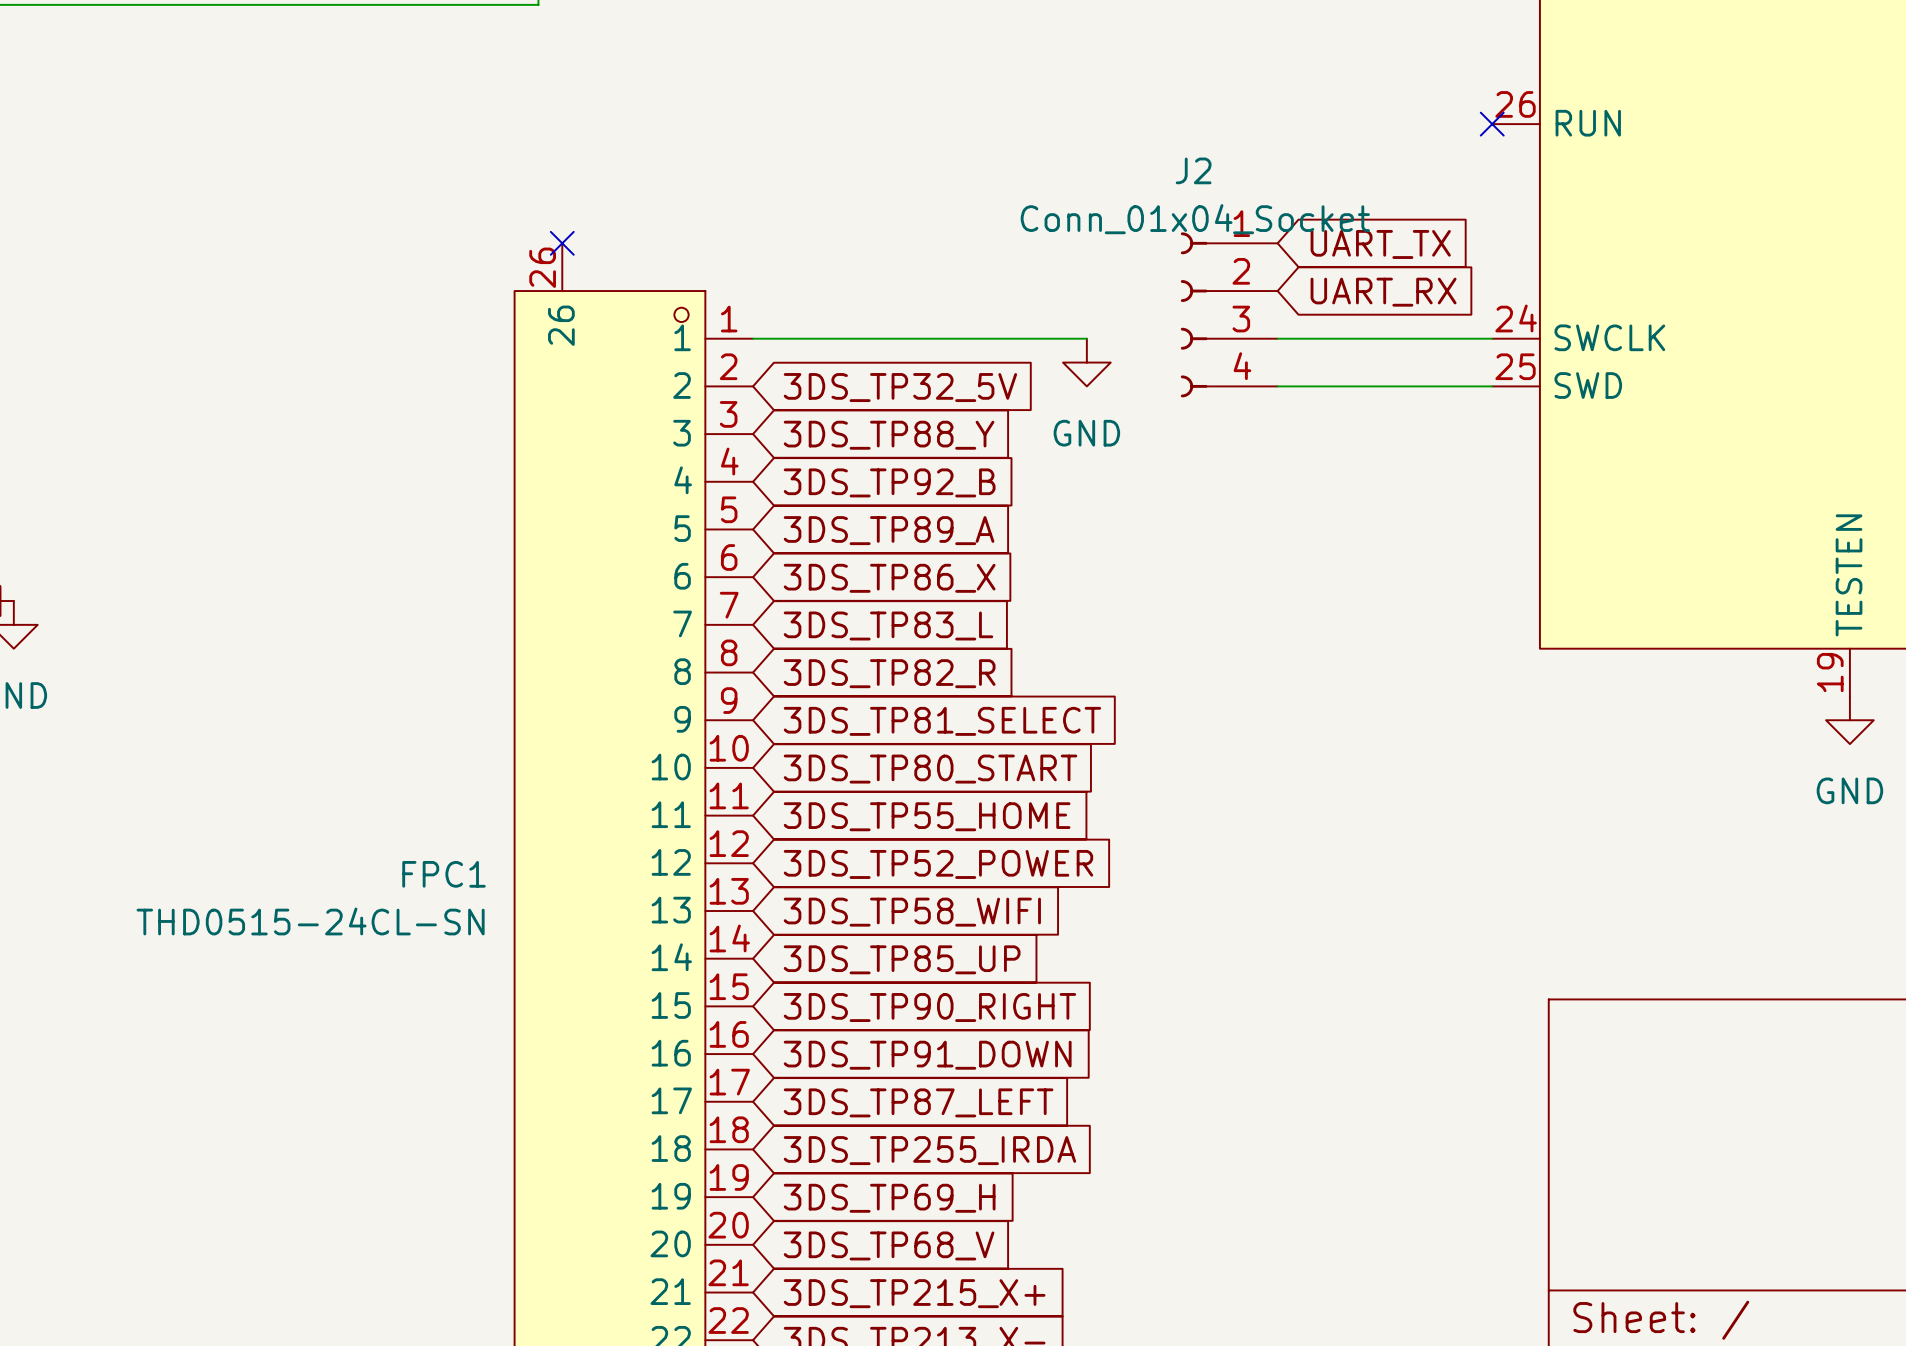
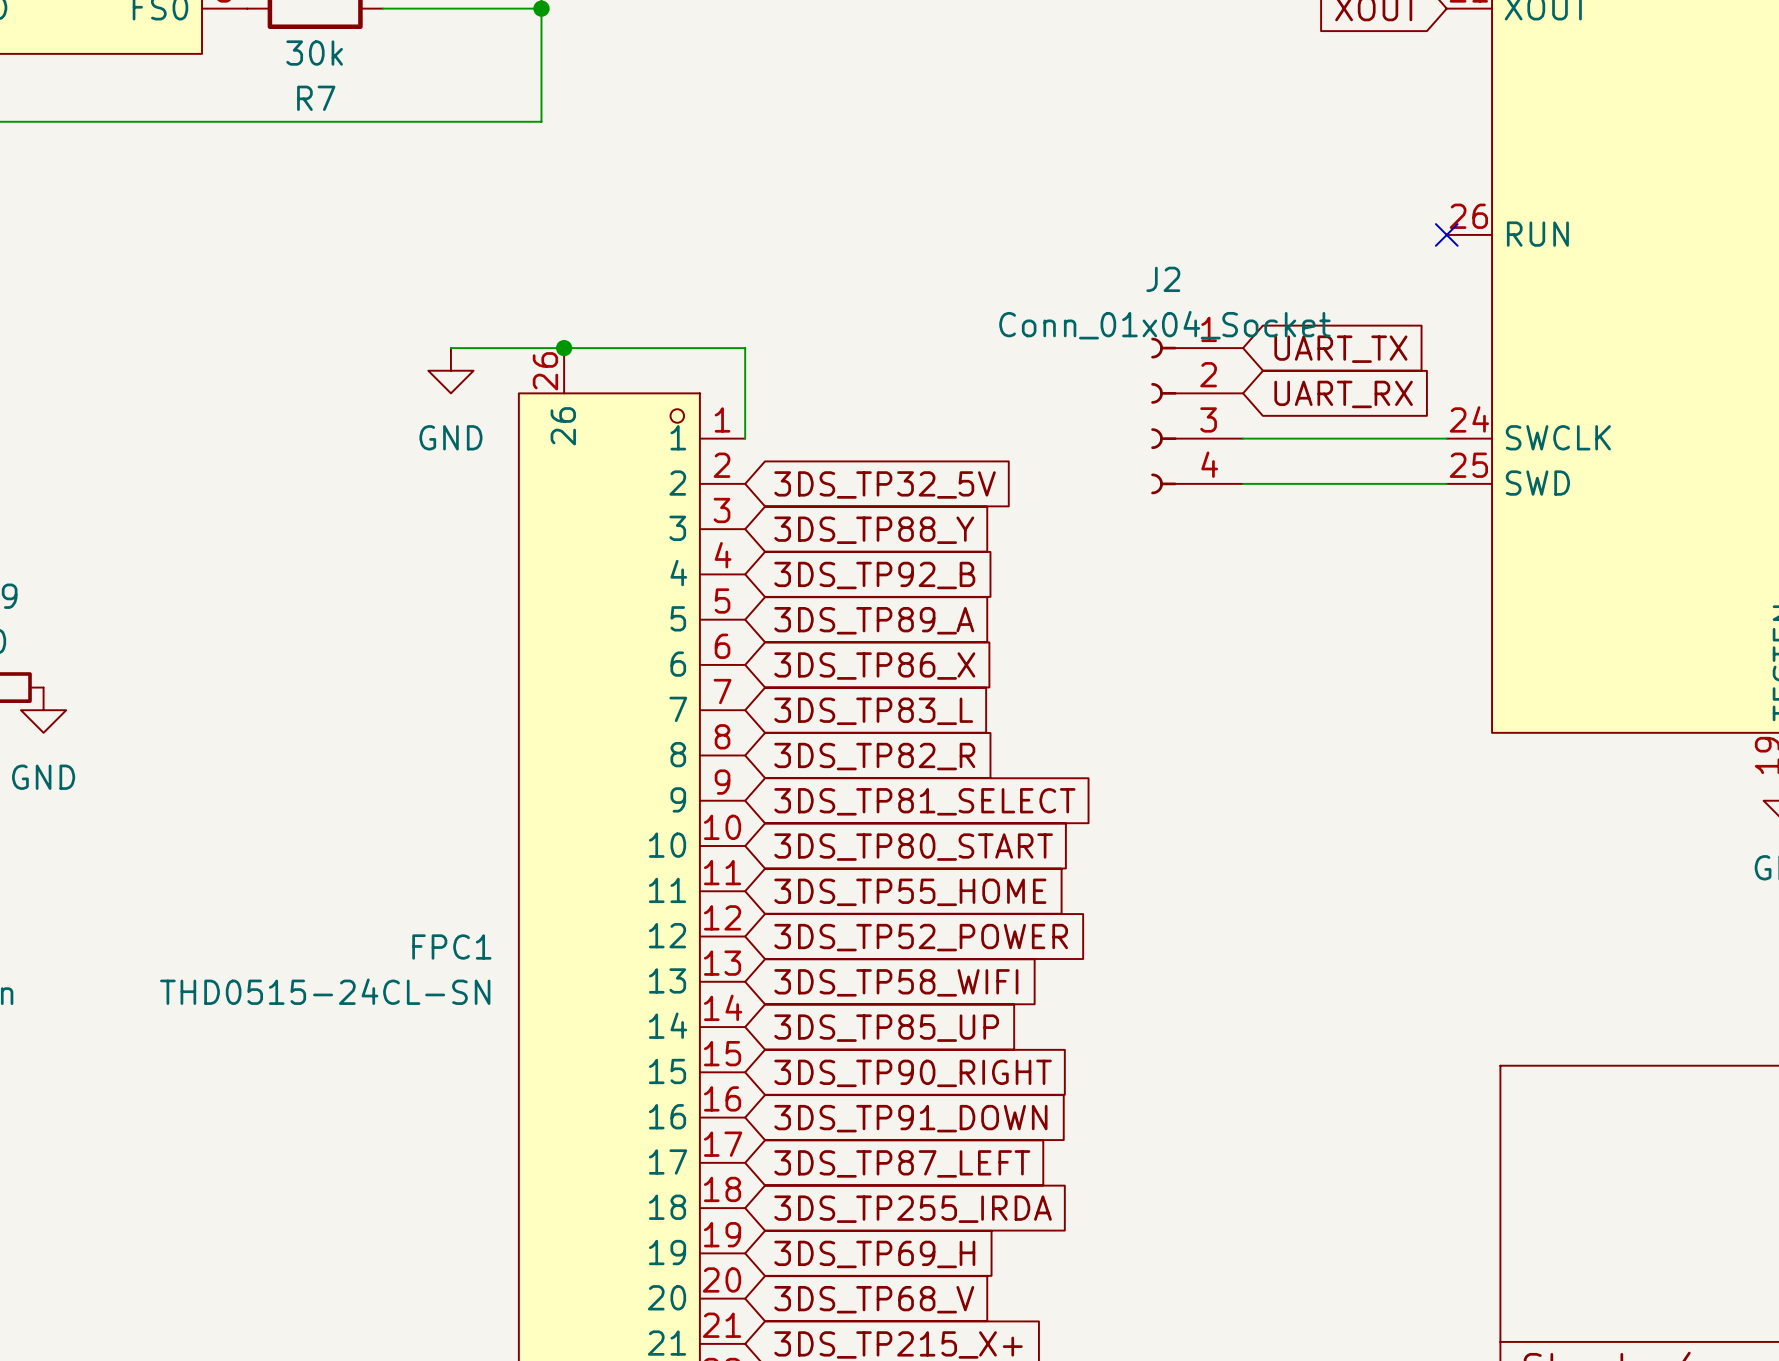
no-connect mark: (562, 243) -> none
junction: none -> (564, 348)
power symbol: none -> GND (450, 370)
wire: (753, 338) (1086, 338) -> (745, 438) (745, 348) (450, 348)
power symbol: GND (1086, 362) -> none

